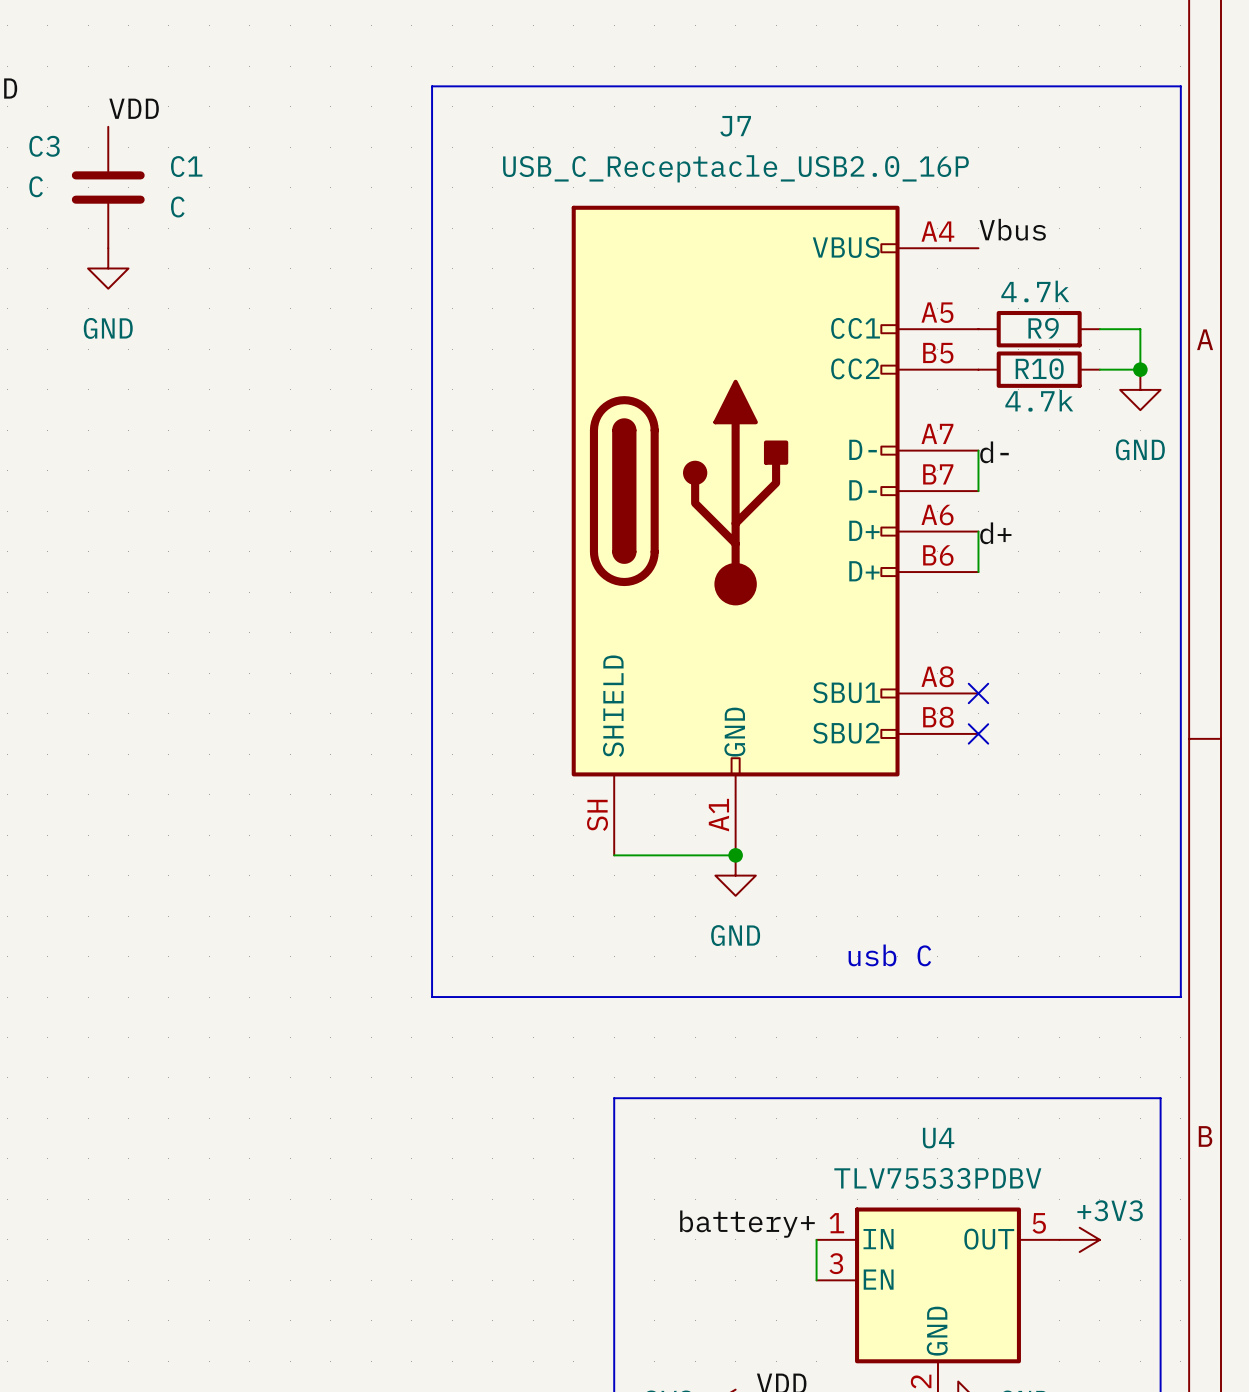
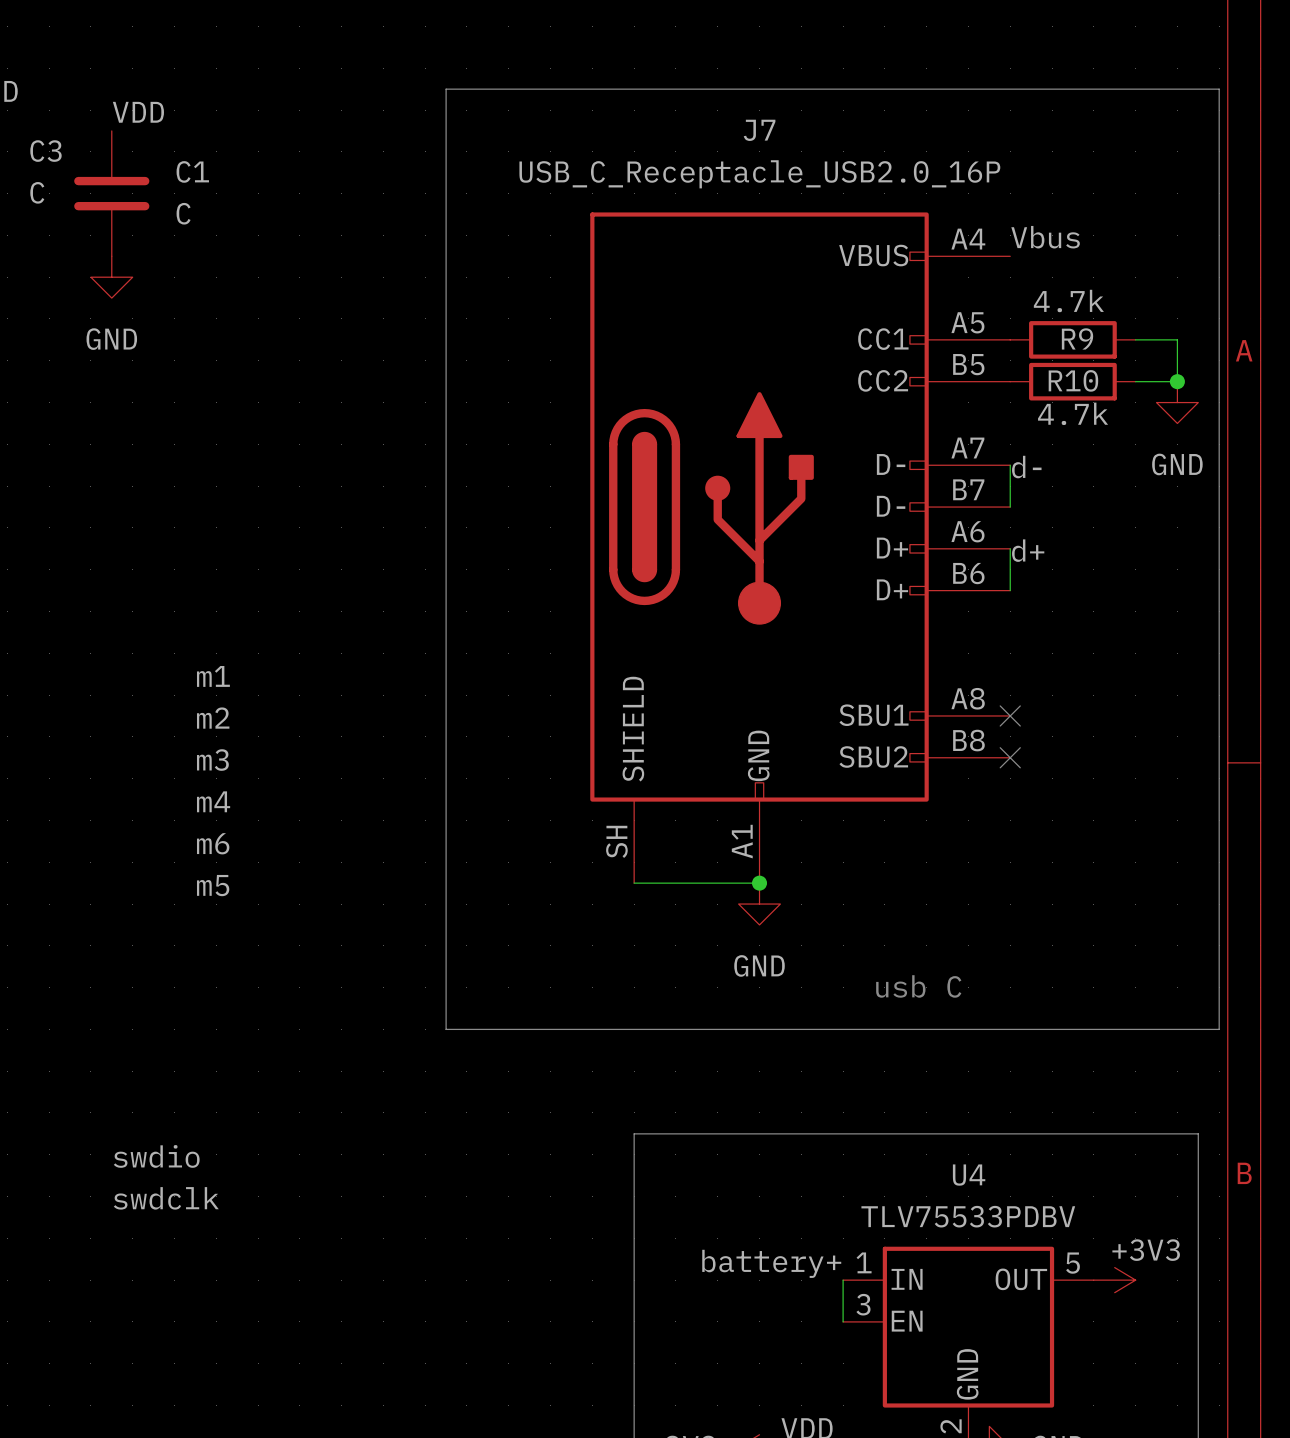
label: none -> m1 (213, 676)
label: none -> m2 (213, 718)
label: none -> m3 (212, 760)
label: none -> m4 (213, 801)
label: none -> m6 (213, 843)
label: none -> m5 (213, 885)
label: none -> swdio (156, 1156)
label: none -> swdclk (166, 1198)

